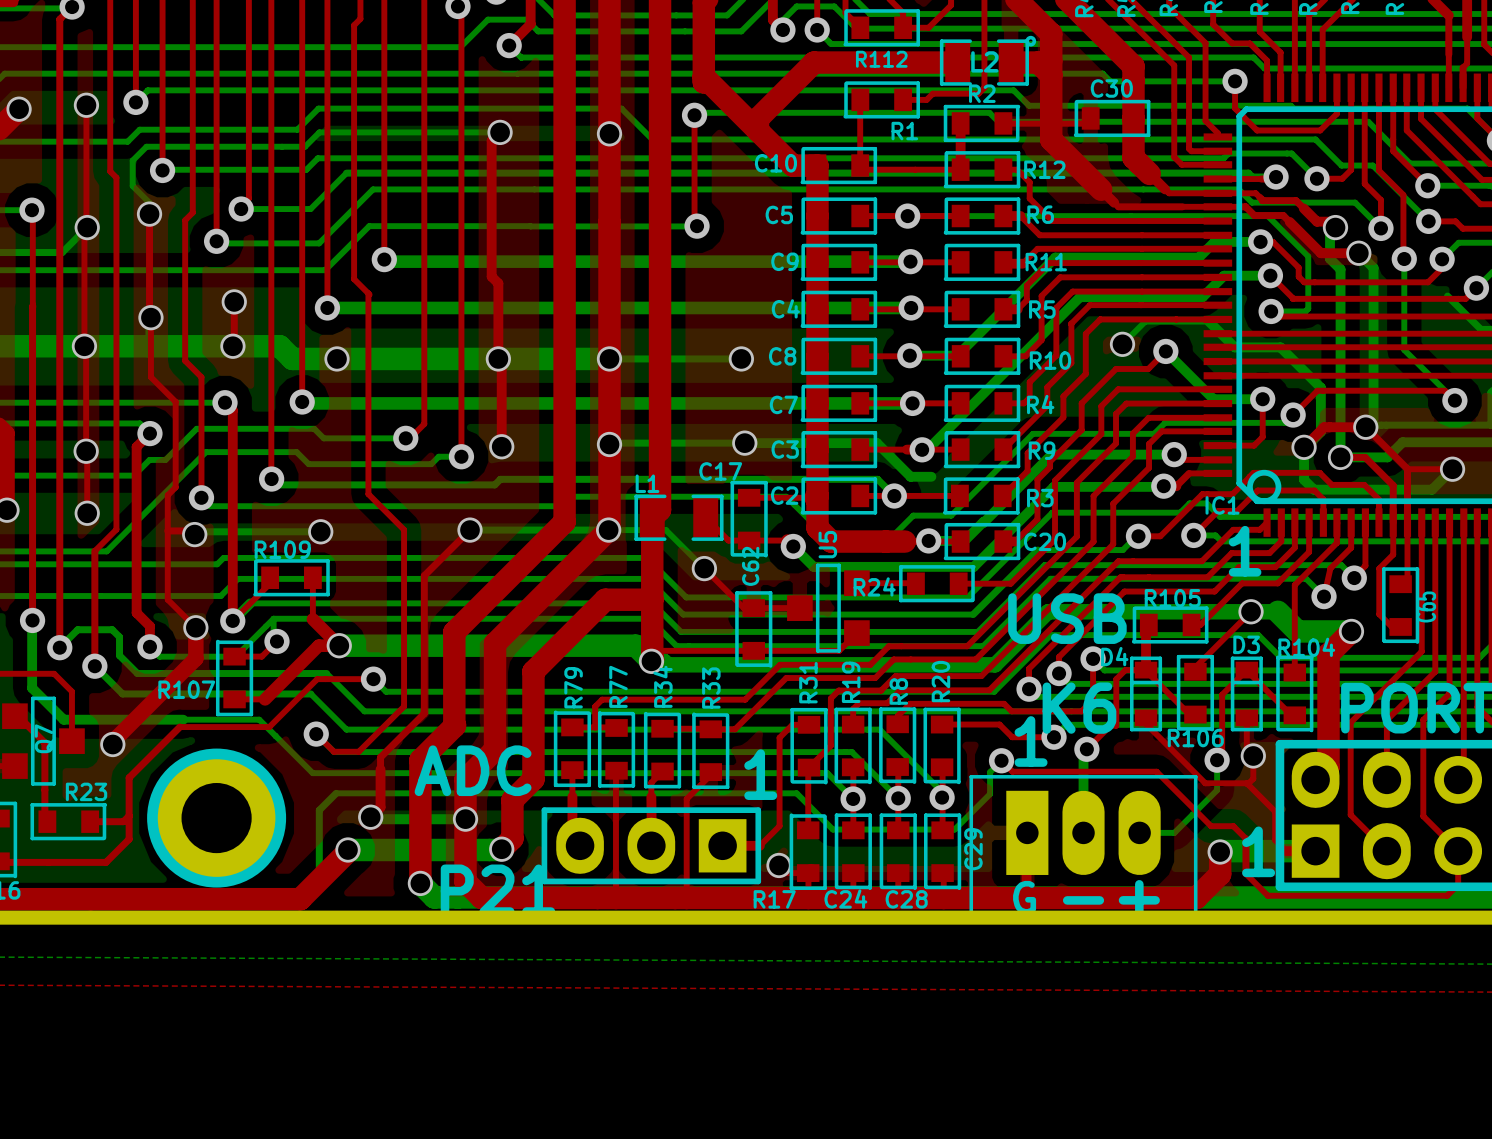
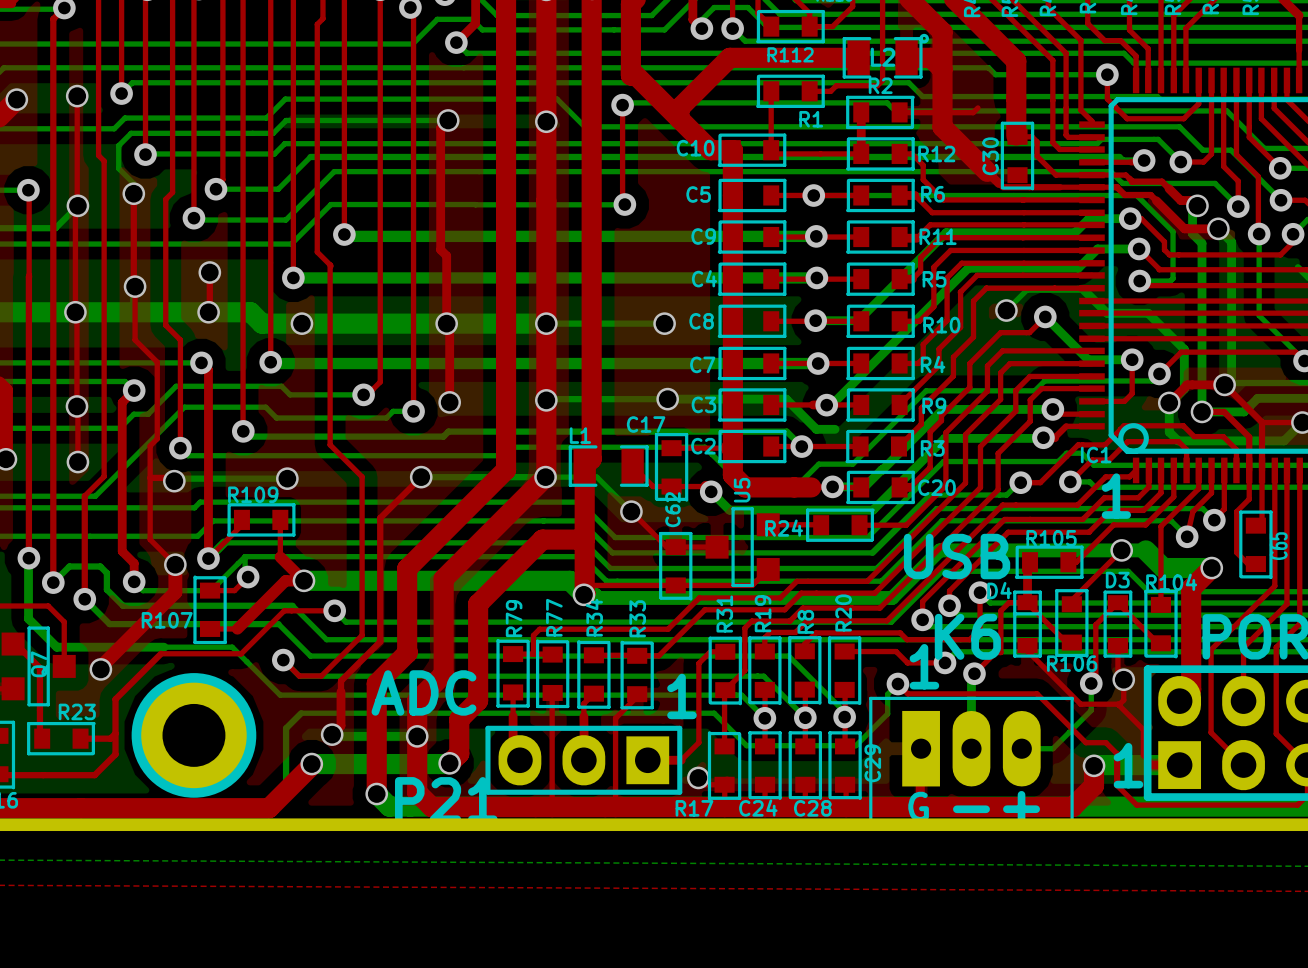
C30 rotation: 0° (1112, 118) -> 90° counterclockwise (1017, 156)
C30 position: (1112, 118) -> (1017, 156)
top track: (1133, 149) (1133, 157) (1169, 193) (1177, 193) -> (1016, 135) (1032, 136) (1037, 141) (1037, 156) (1055, 175)

